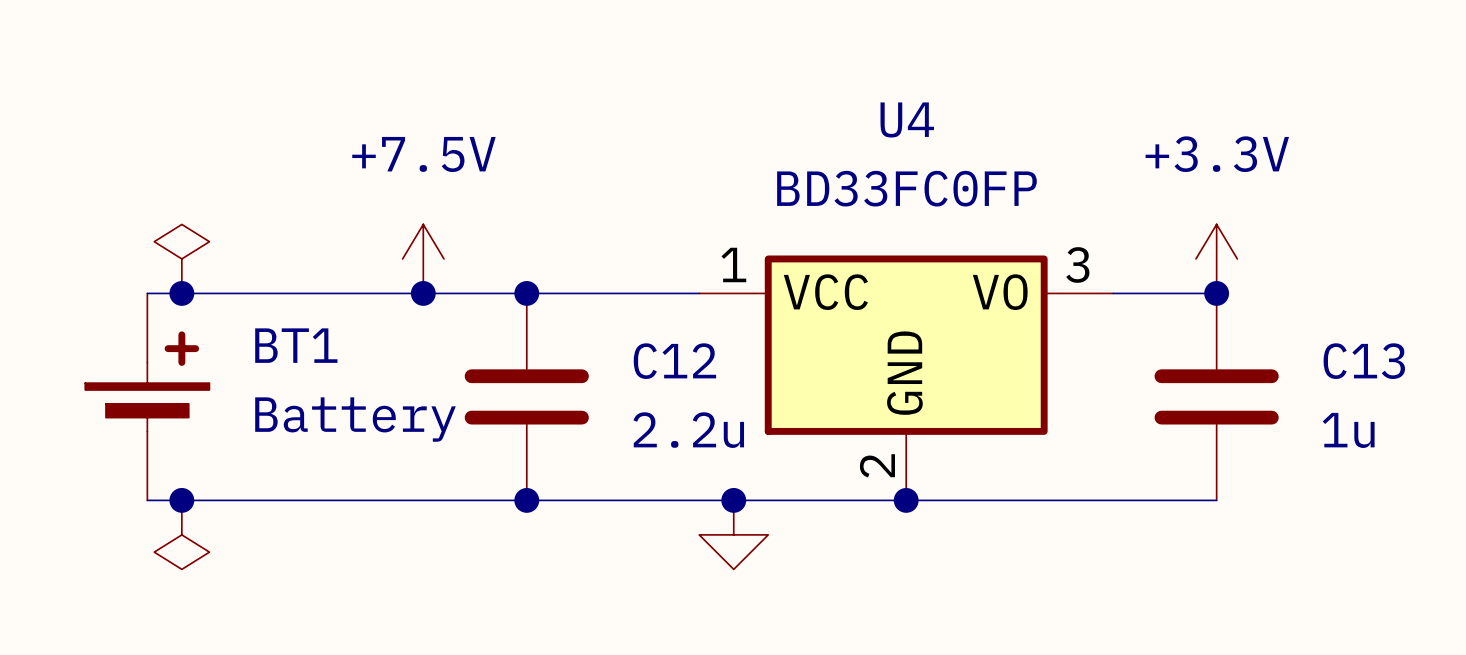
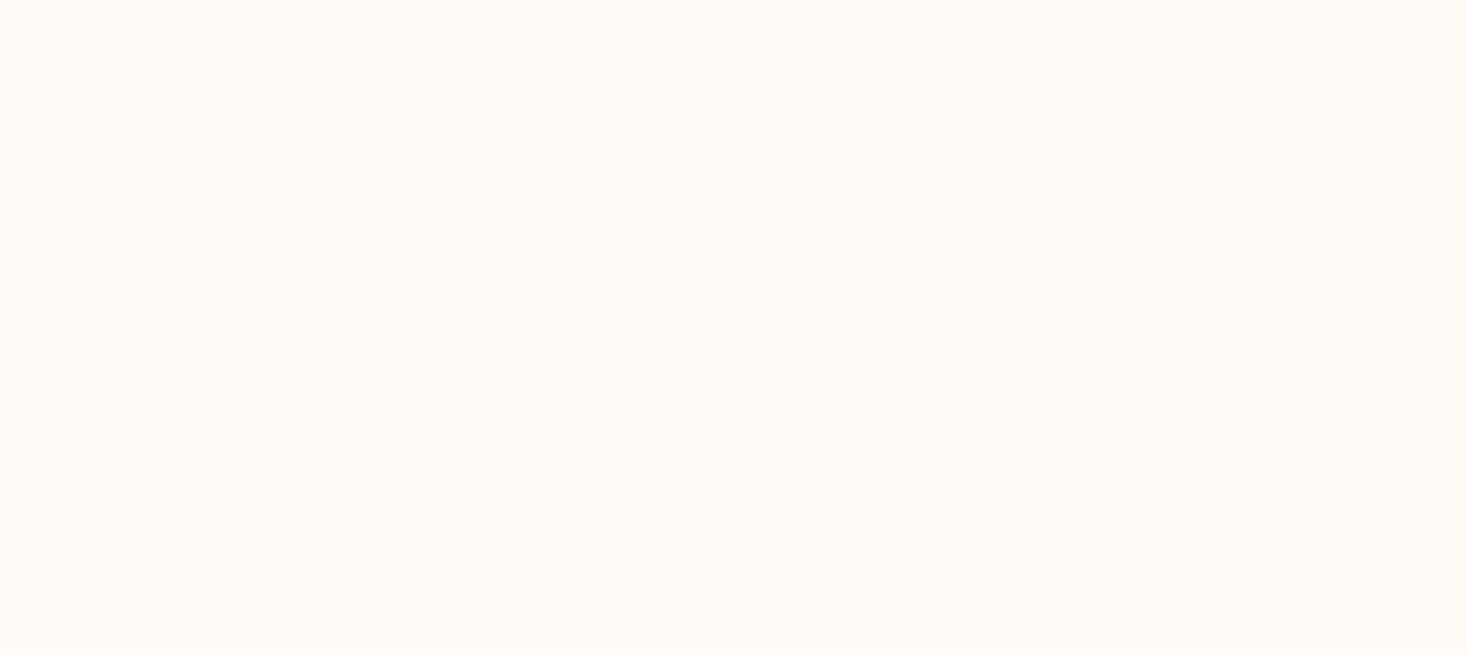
power symbol: (181, 258) -> none
power symbol: +7.5V (423, 258) -> none
power symbol: +3.3V (1216, 258) -> none
wire: (147, 293) (699, 293) -> none
junction: (181, 293) -> none
junction: (423, 293) -> none
junction: (526, 293) -> none
wire: (1113, 293) (1216, 293) -> none
junction: (1216, 293) -> none
U4: BD33FC0FP (906, 377) -> none
BT1: Battery (147, 396) -> none
C12: 2.2u (526, 396) -> none
C13: 1u (1216, 396) -> none
wire: (147, 500) (1216, 500) -> none
junction: (181, 500) -> none
junction: (526, 500) -> none
junction: (733, 500) -> none
junction: (906, 500) -> none
power symbol: (181, 534) -> none
power symbol: (733, 534) -> none

